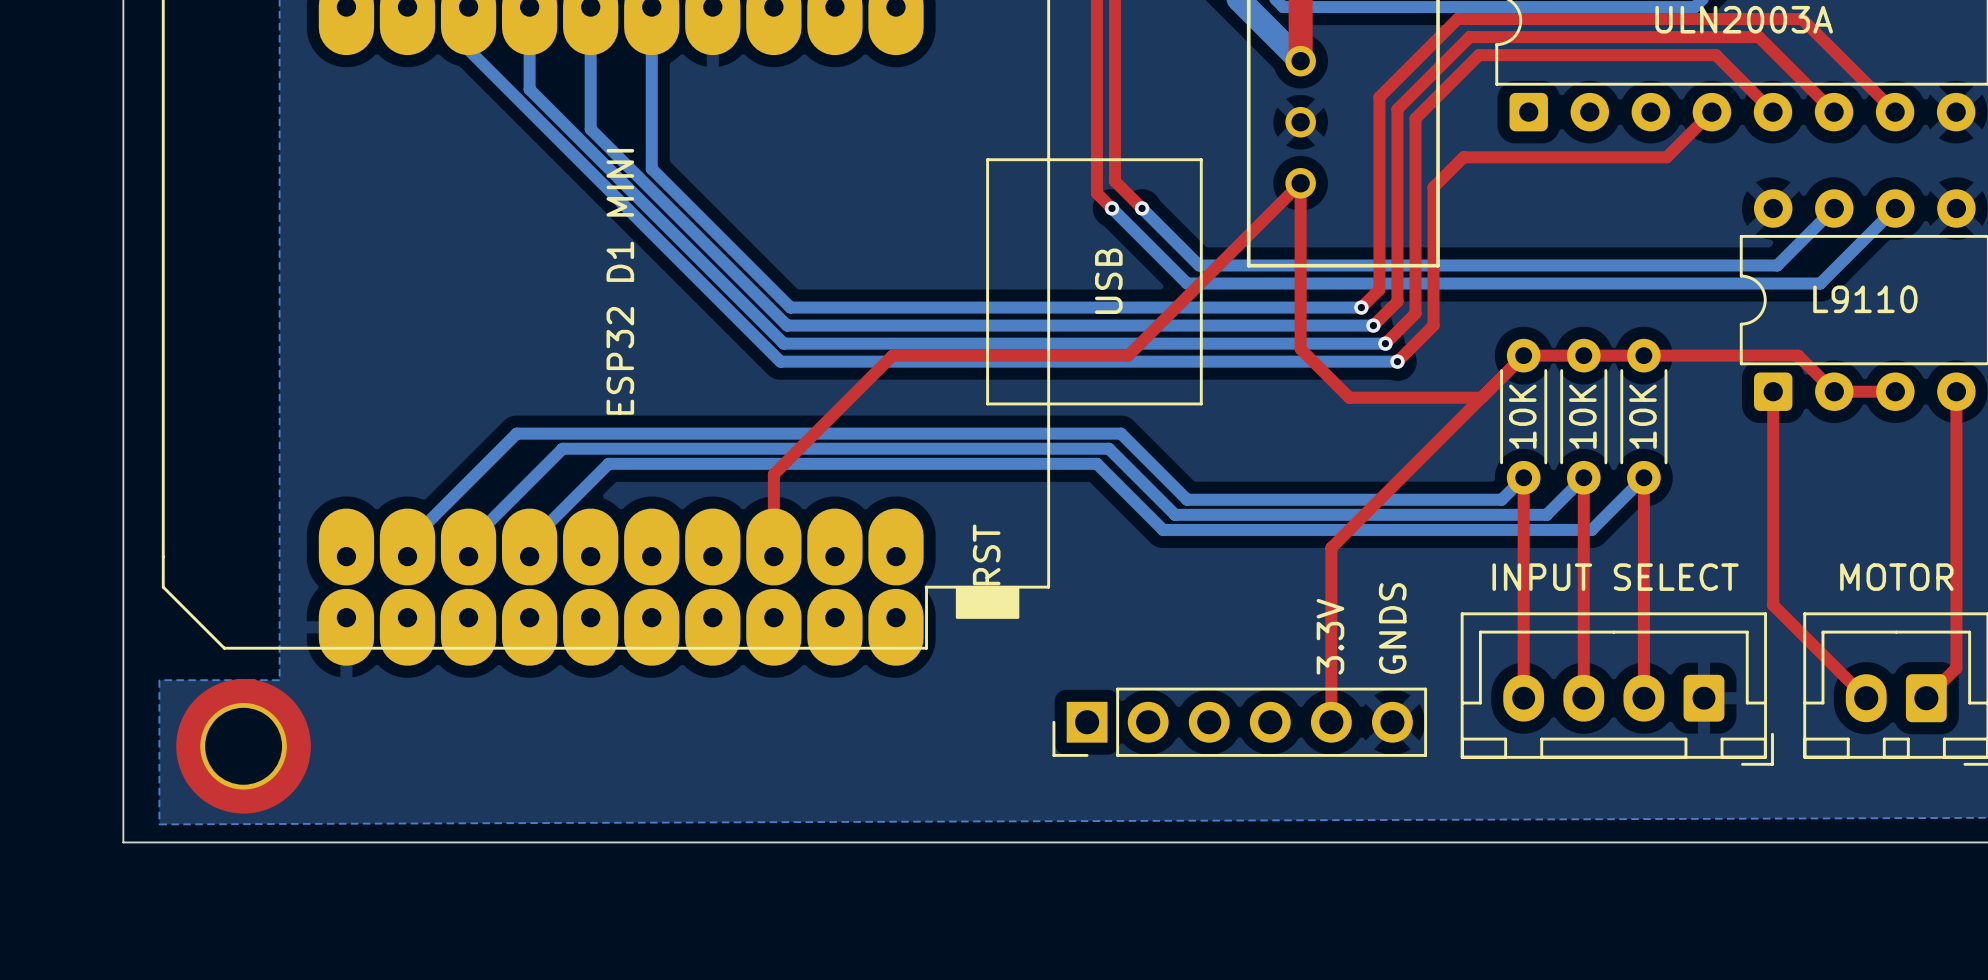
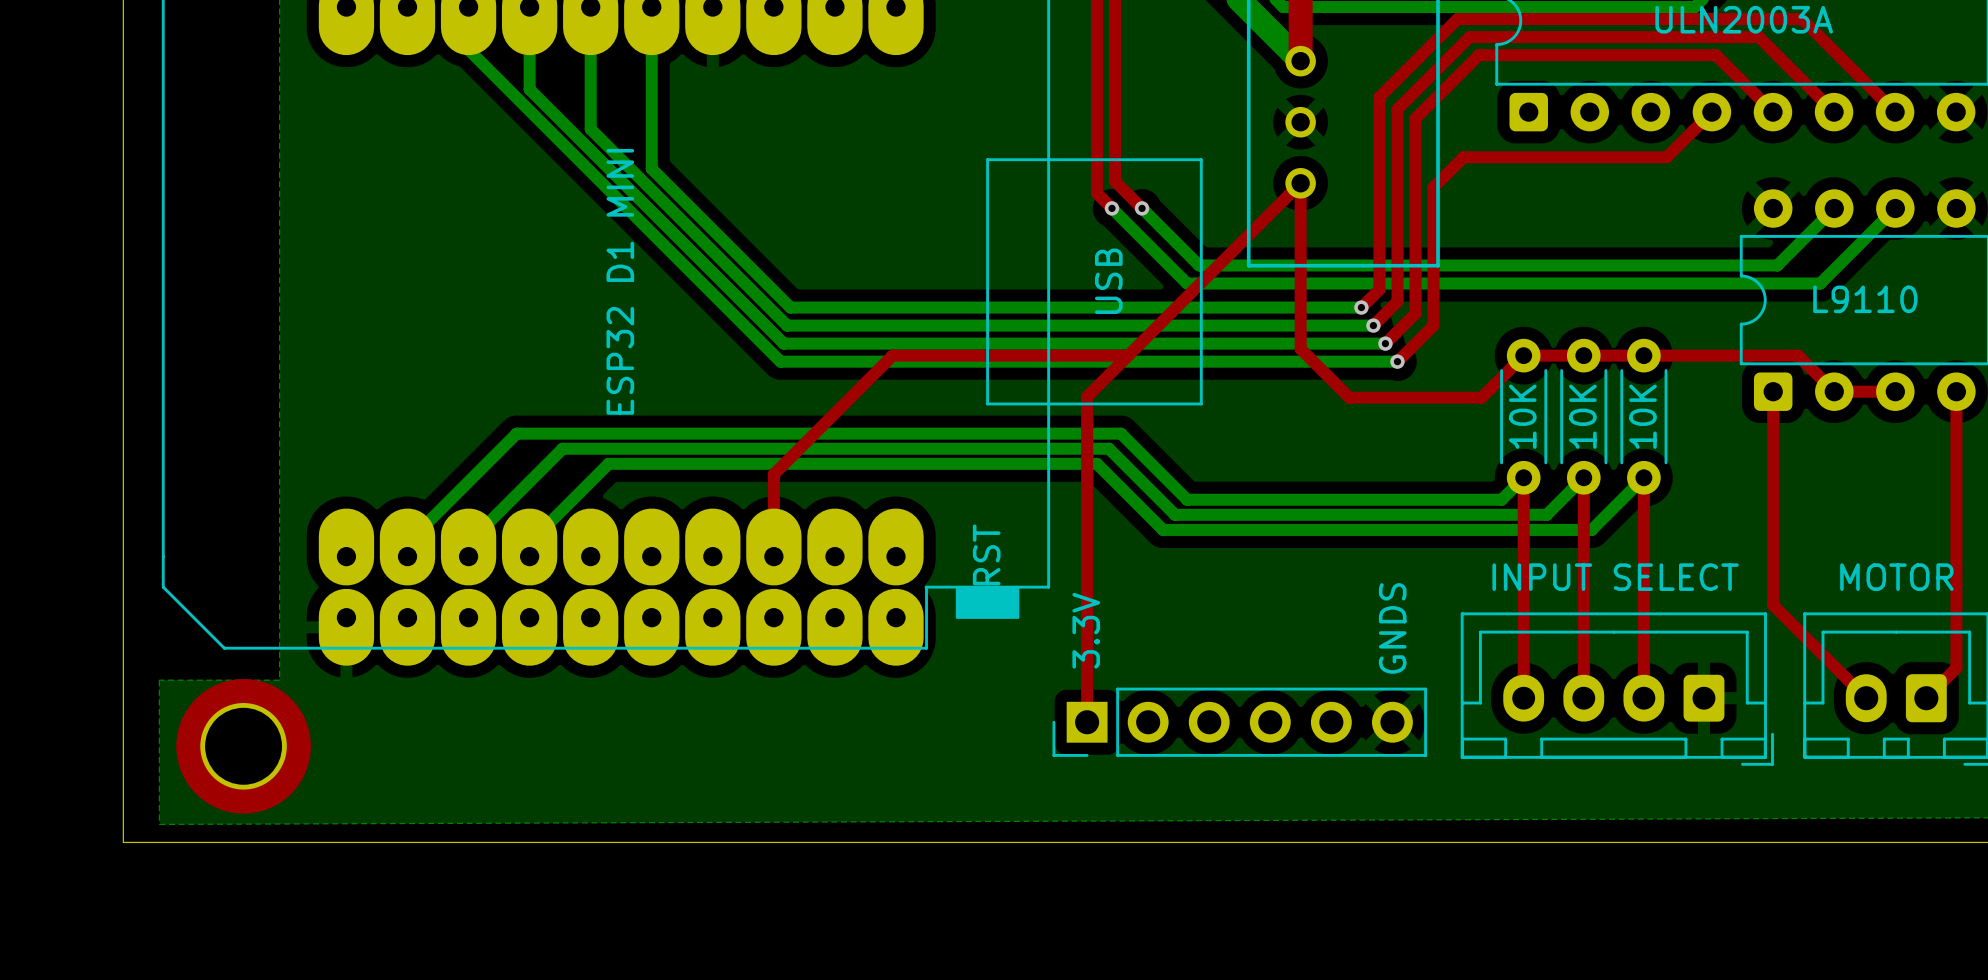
top track: none -> (1128, 355) (1087, 396) (1087, 722)
top track: (1481, 397) (1331, 547) (1331, 722) -> none
text position: 3.3V (1330, 636) -> 3.3V (1086, 630)

